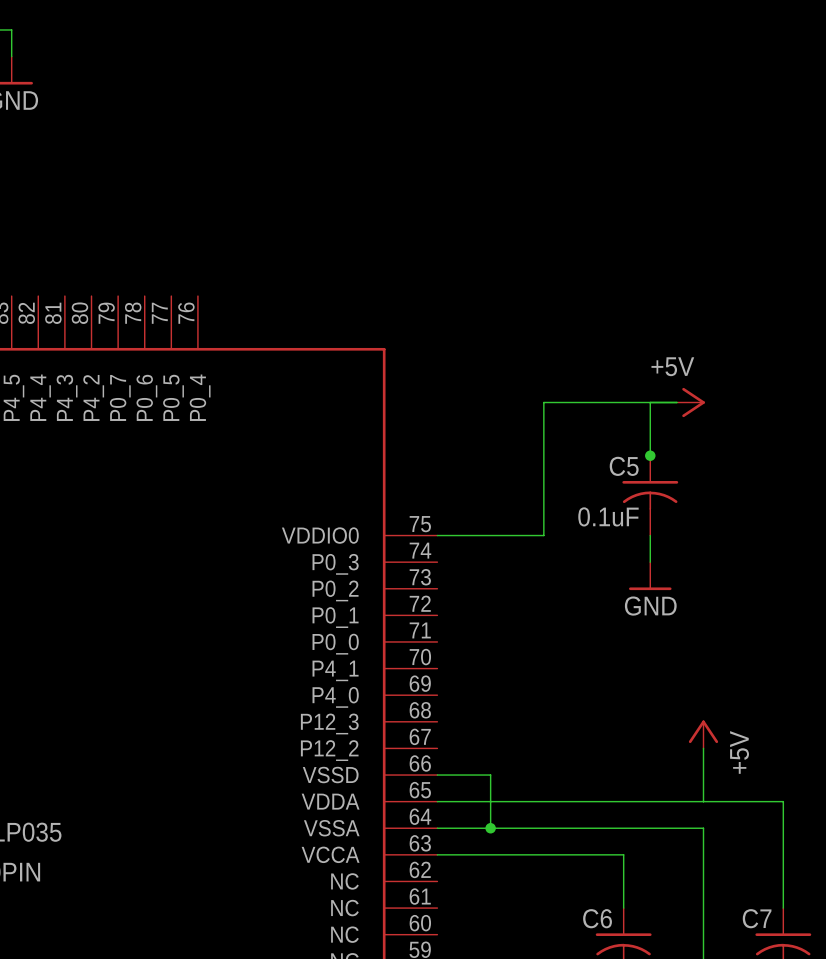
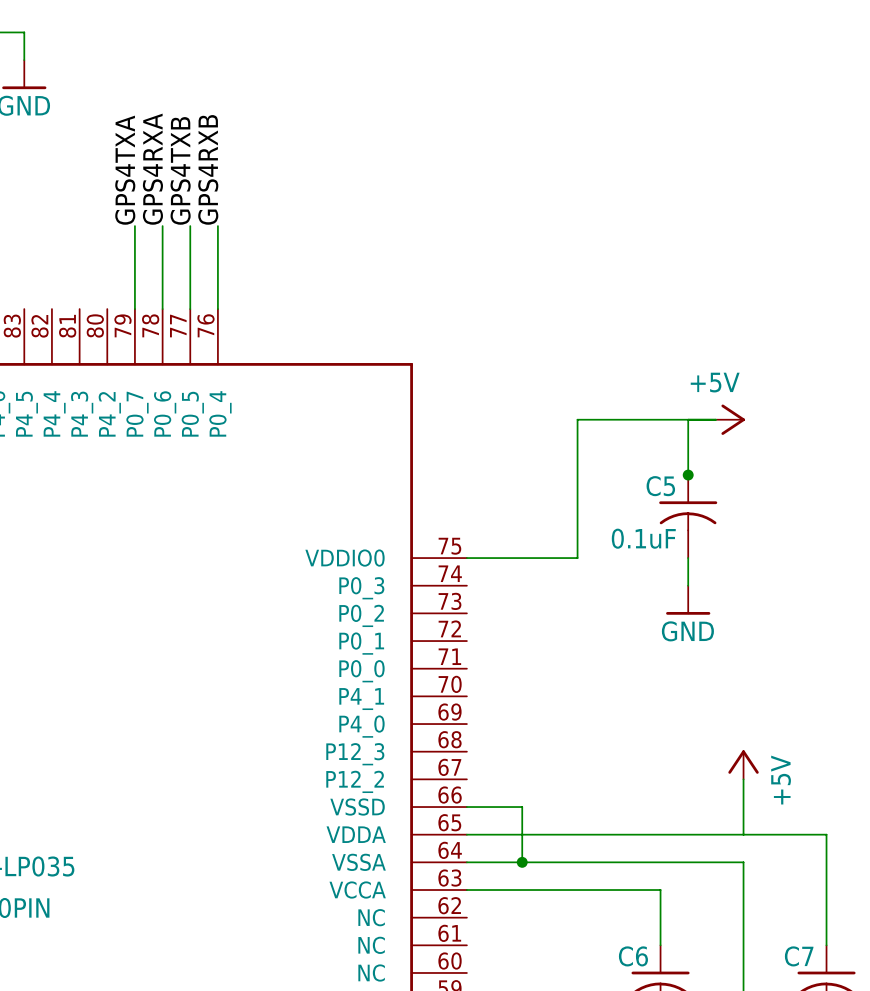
label: none -> GPS4RXA (152, 169)
label: none -> GPS4RXB (208, 169)
label: none -> GPS4TXA (125, 170)
label: none -> GPS4TXB (180, 170)
wire: none -> (134, 226) (134, 309)
wire: none -> (162, 226) (162, 309)
wire: none -> (190, 226) (190, 309)
wire: none -> (217, 226) (217, 309)

